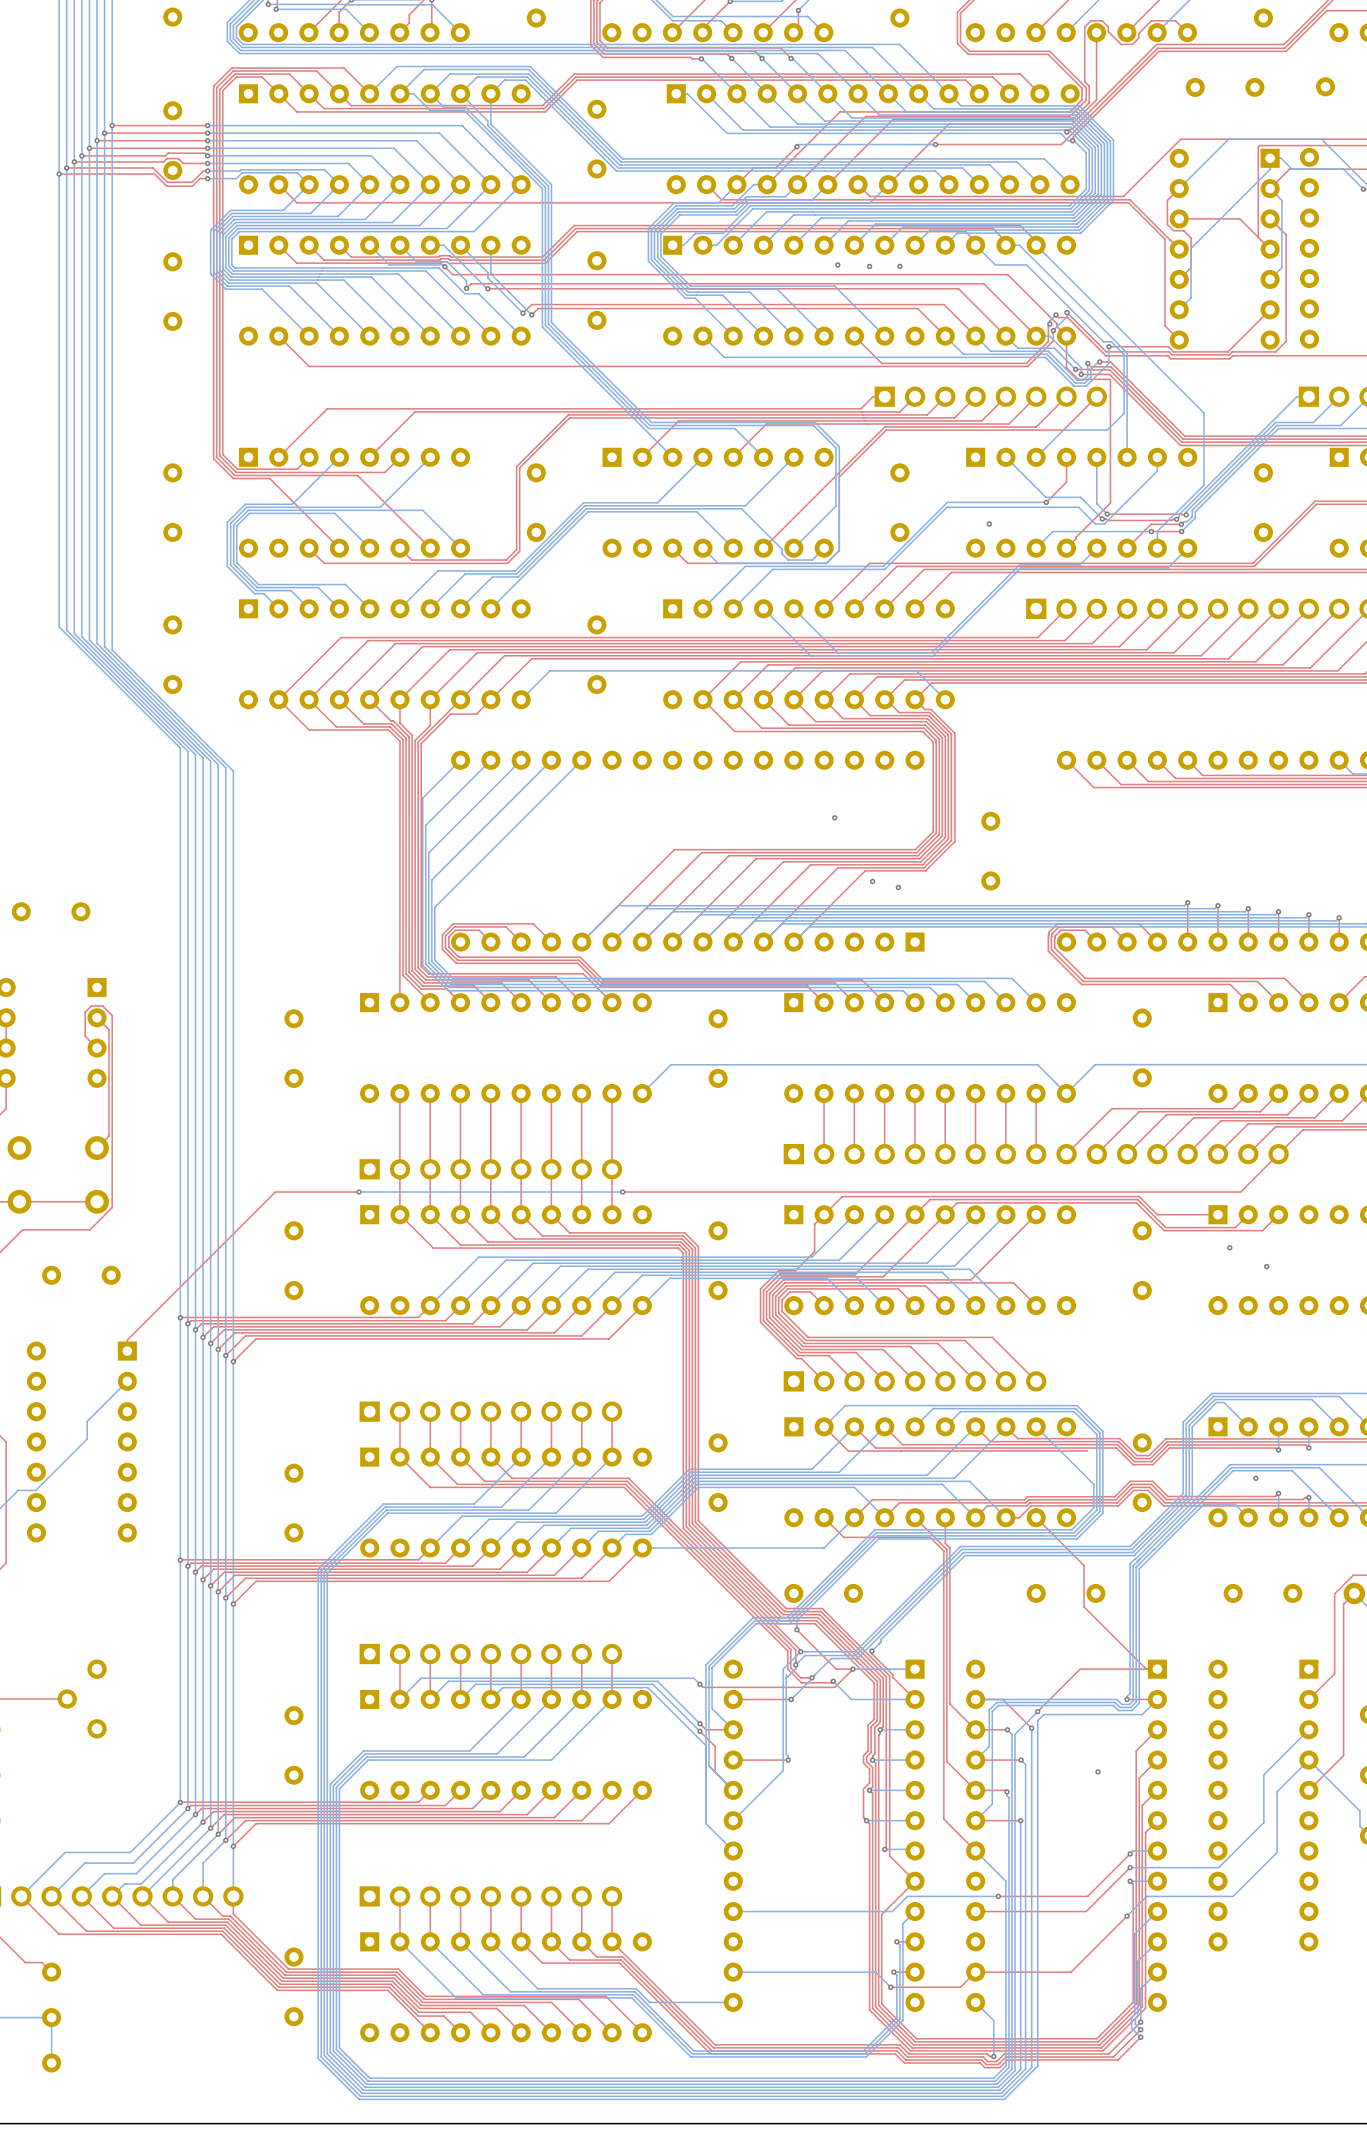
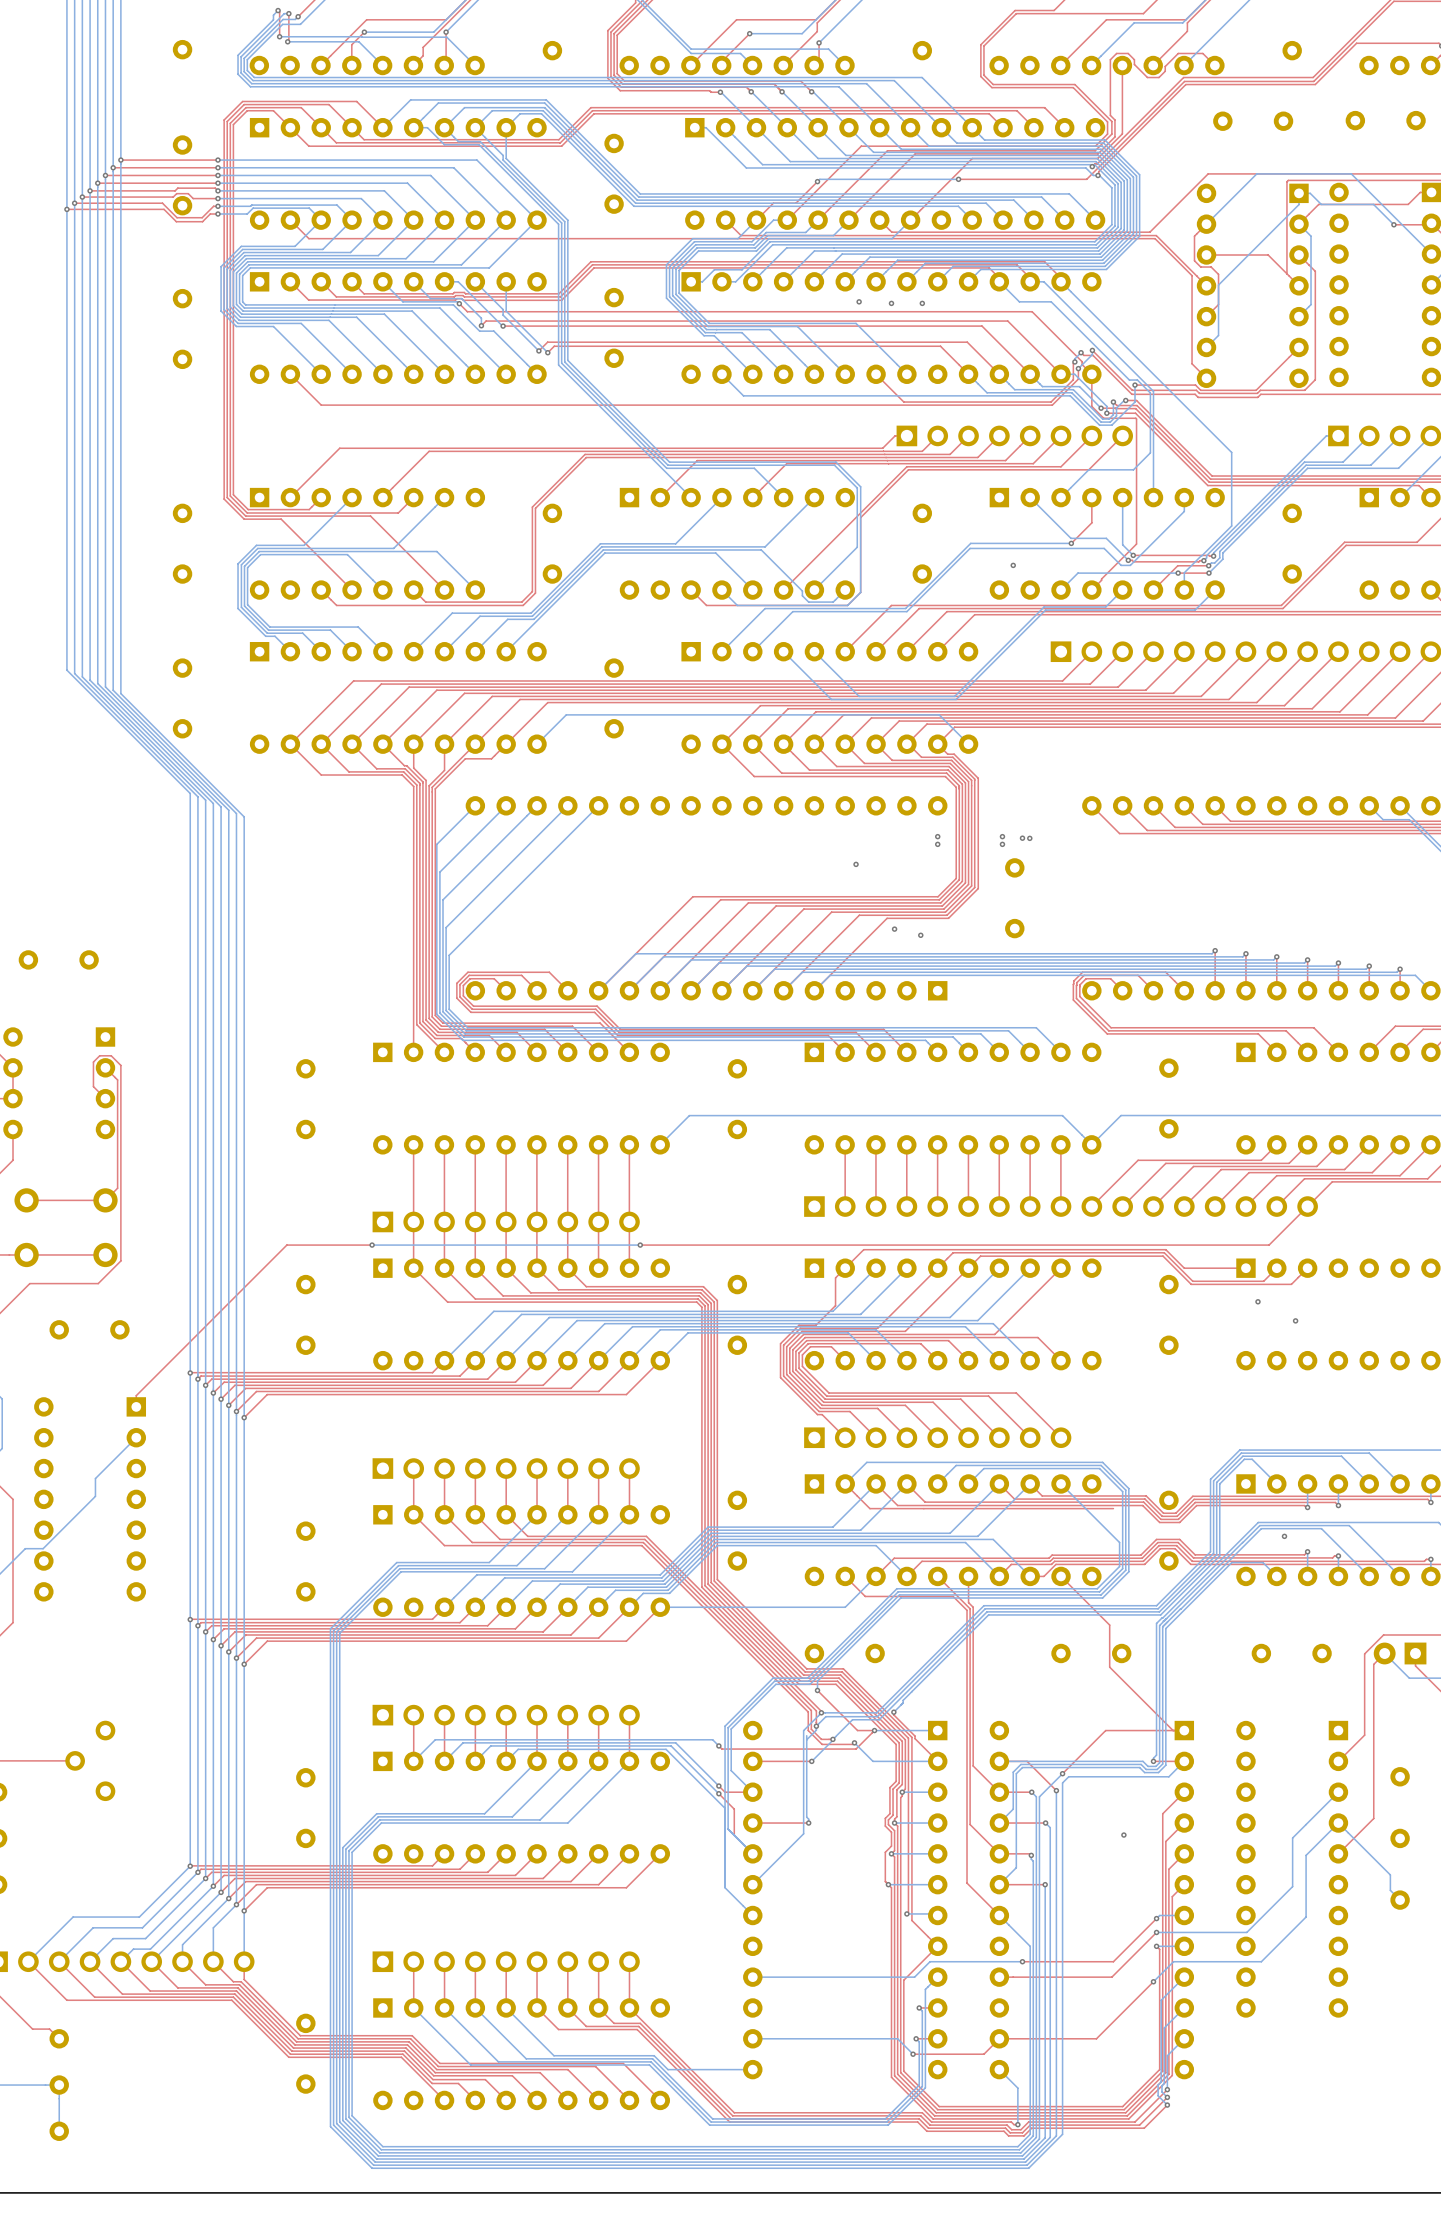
via: none -> (937, 836)
via: none -> (1002, 836)
via: none -> (1022, 838)
via: none -> (1029, 838)
via: none -> (937, 844)
via: none -> (1002, 844)
top track: none -> (105, 1200) (26, 1200)

